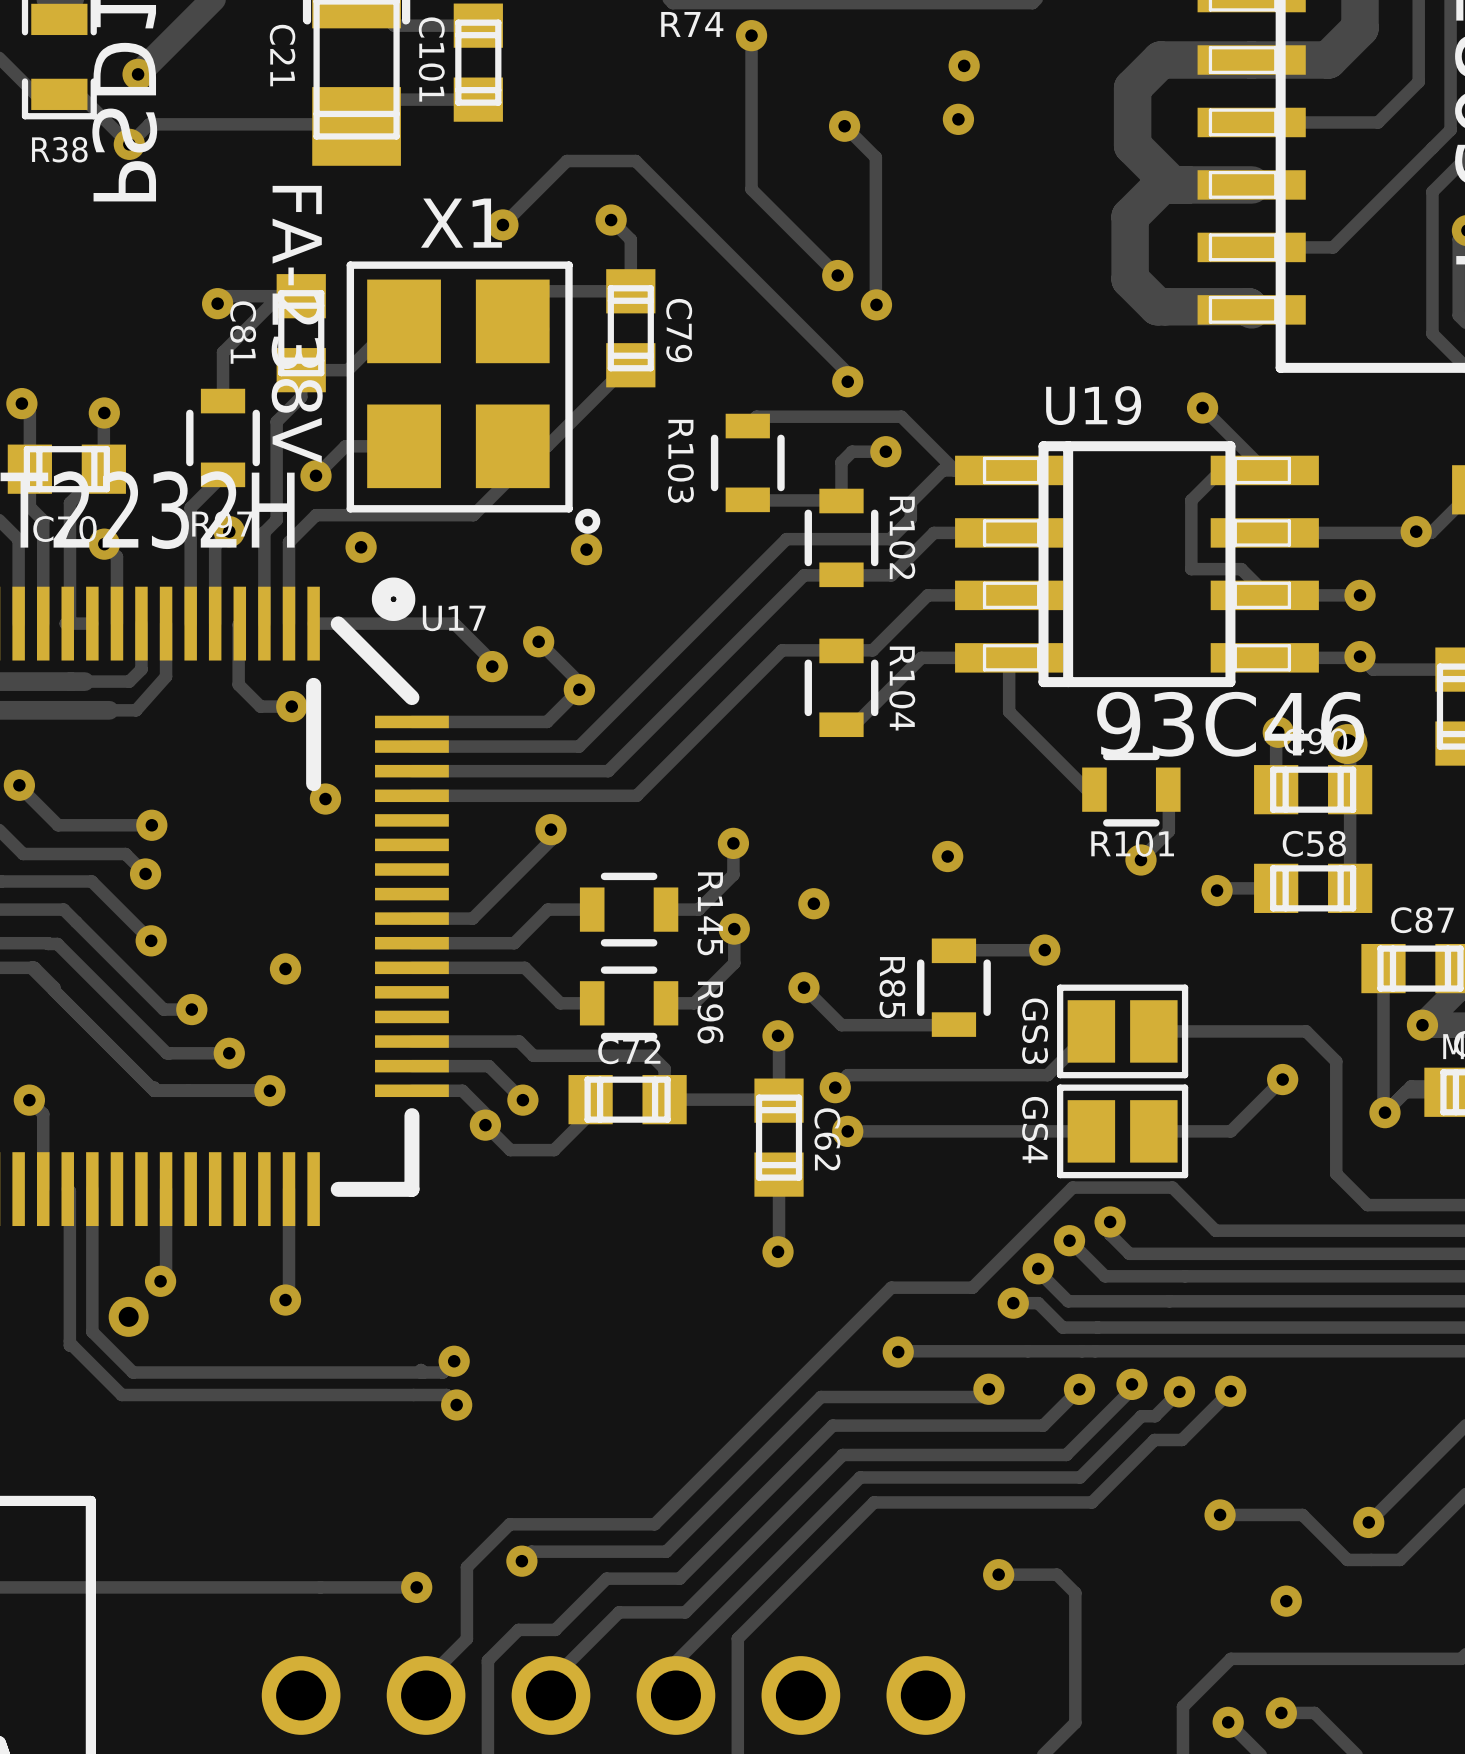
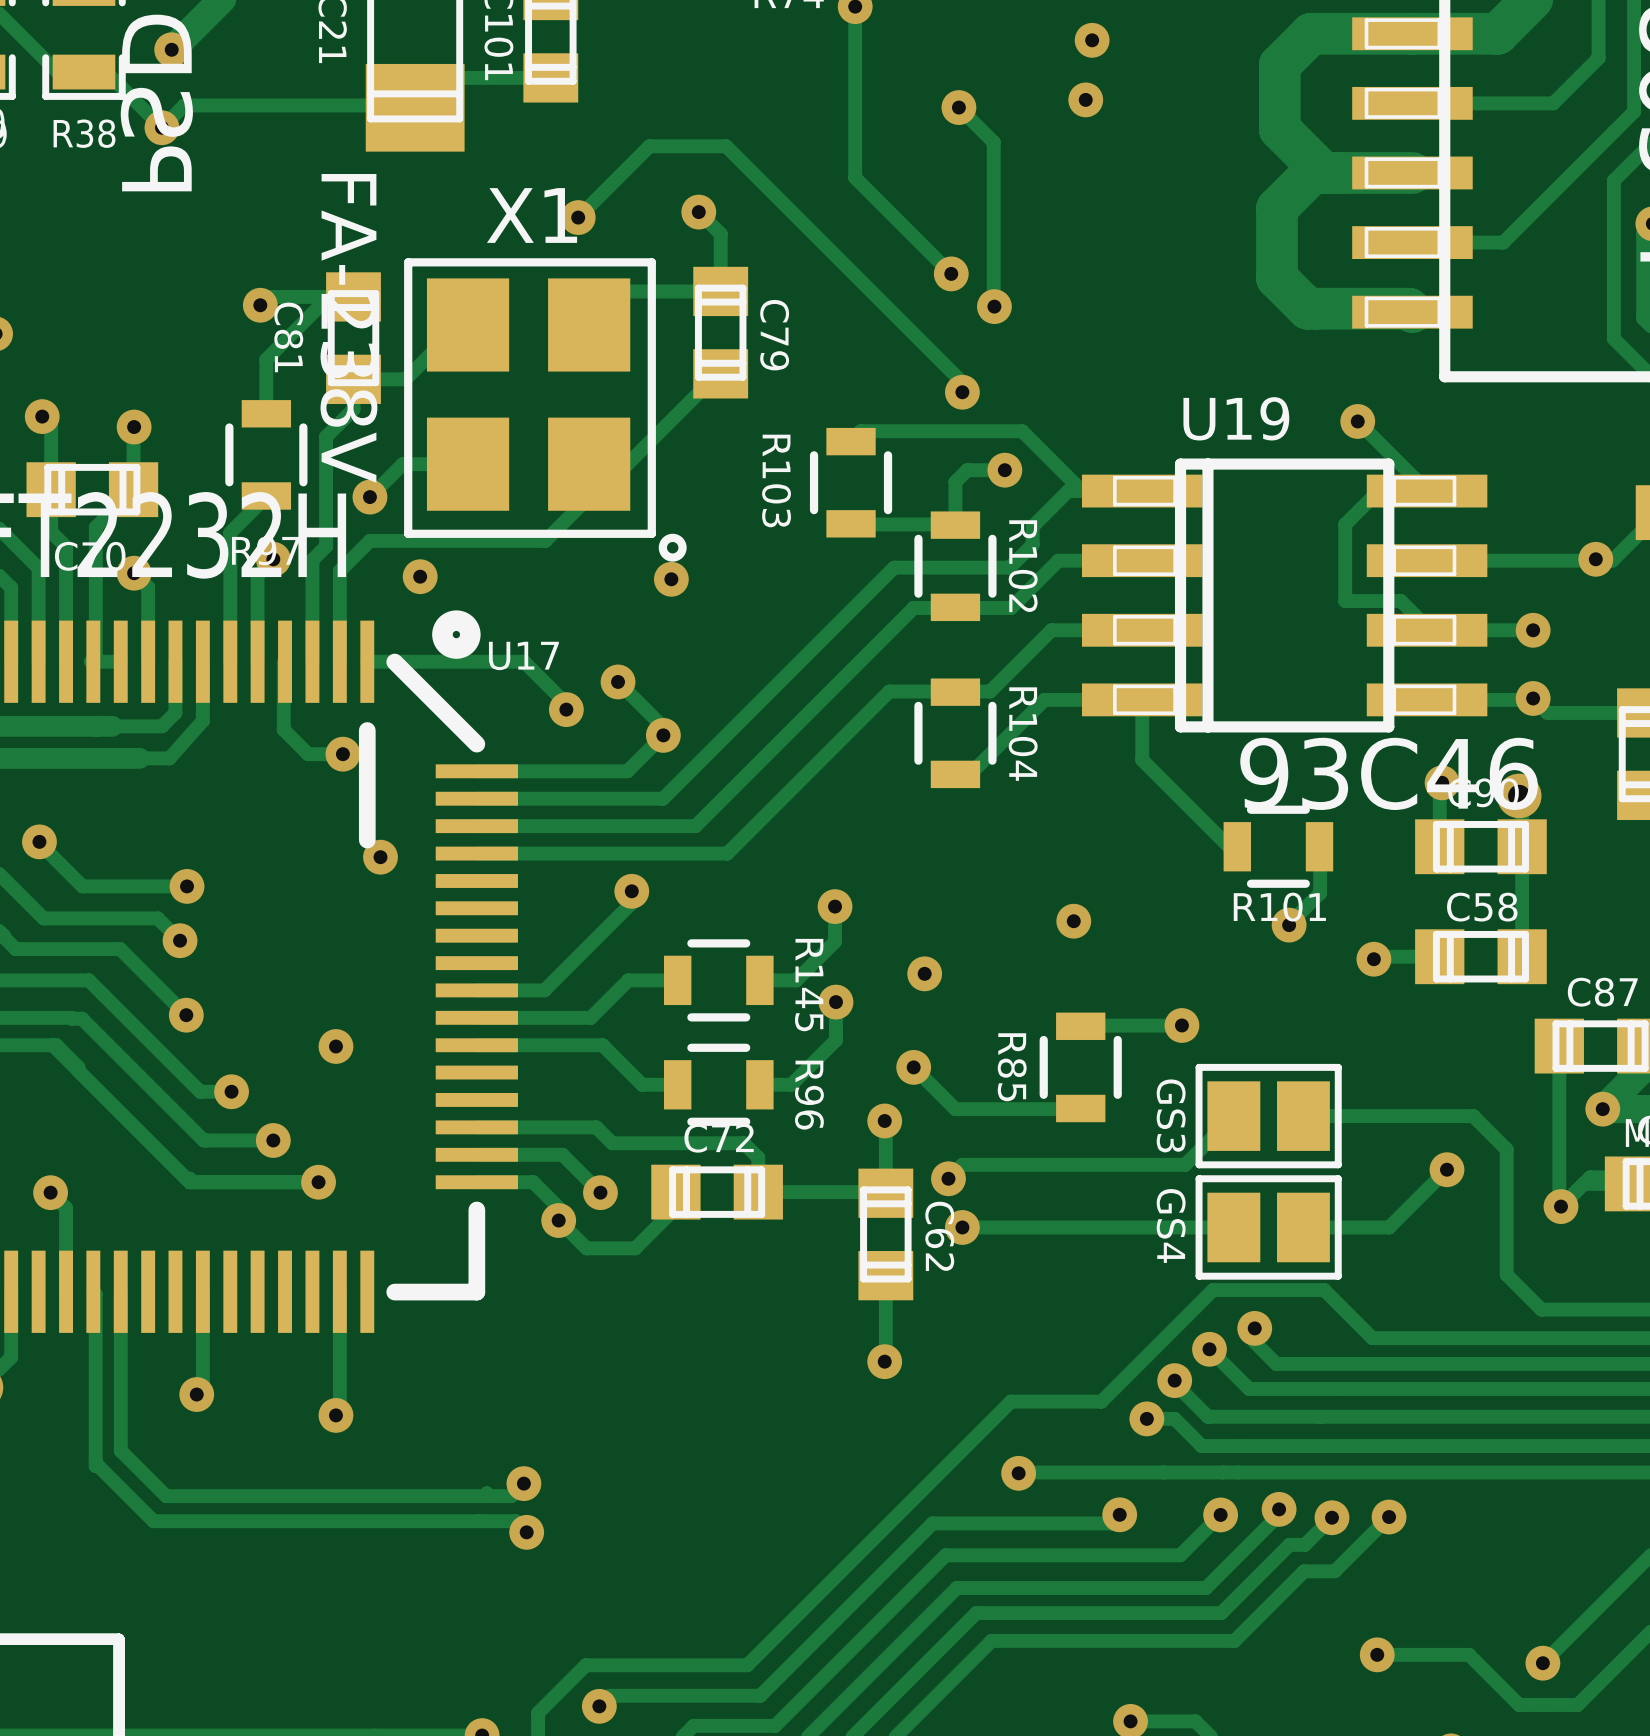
via: (128, 1316) -> none

